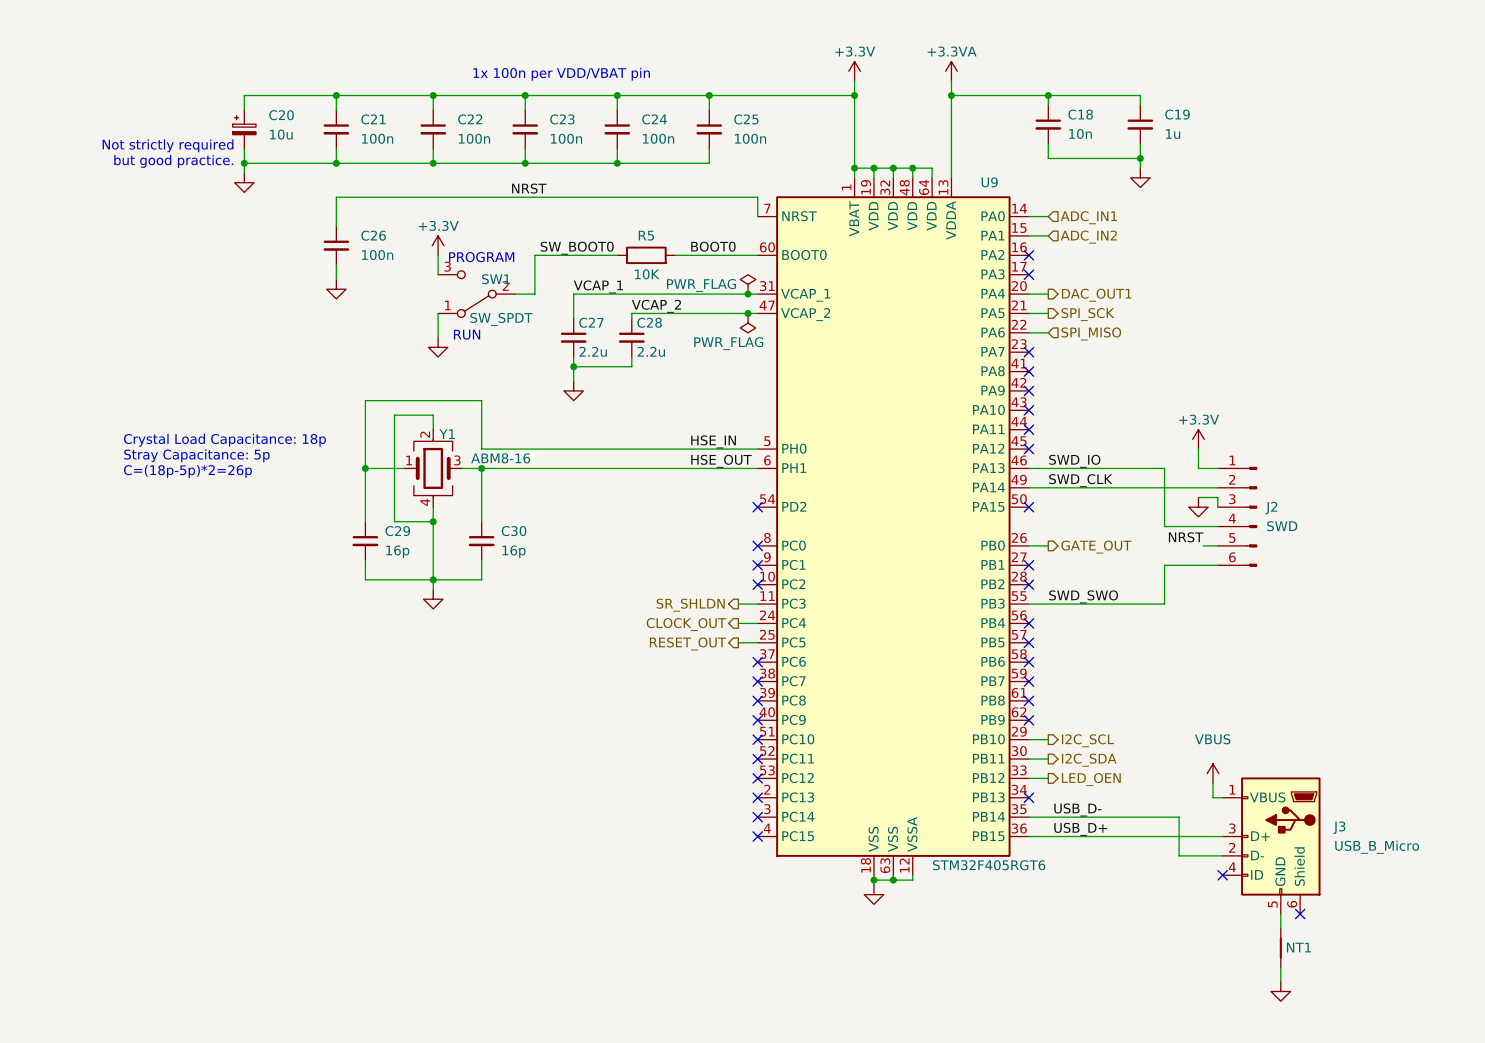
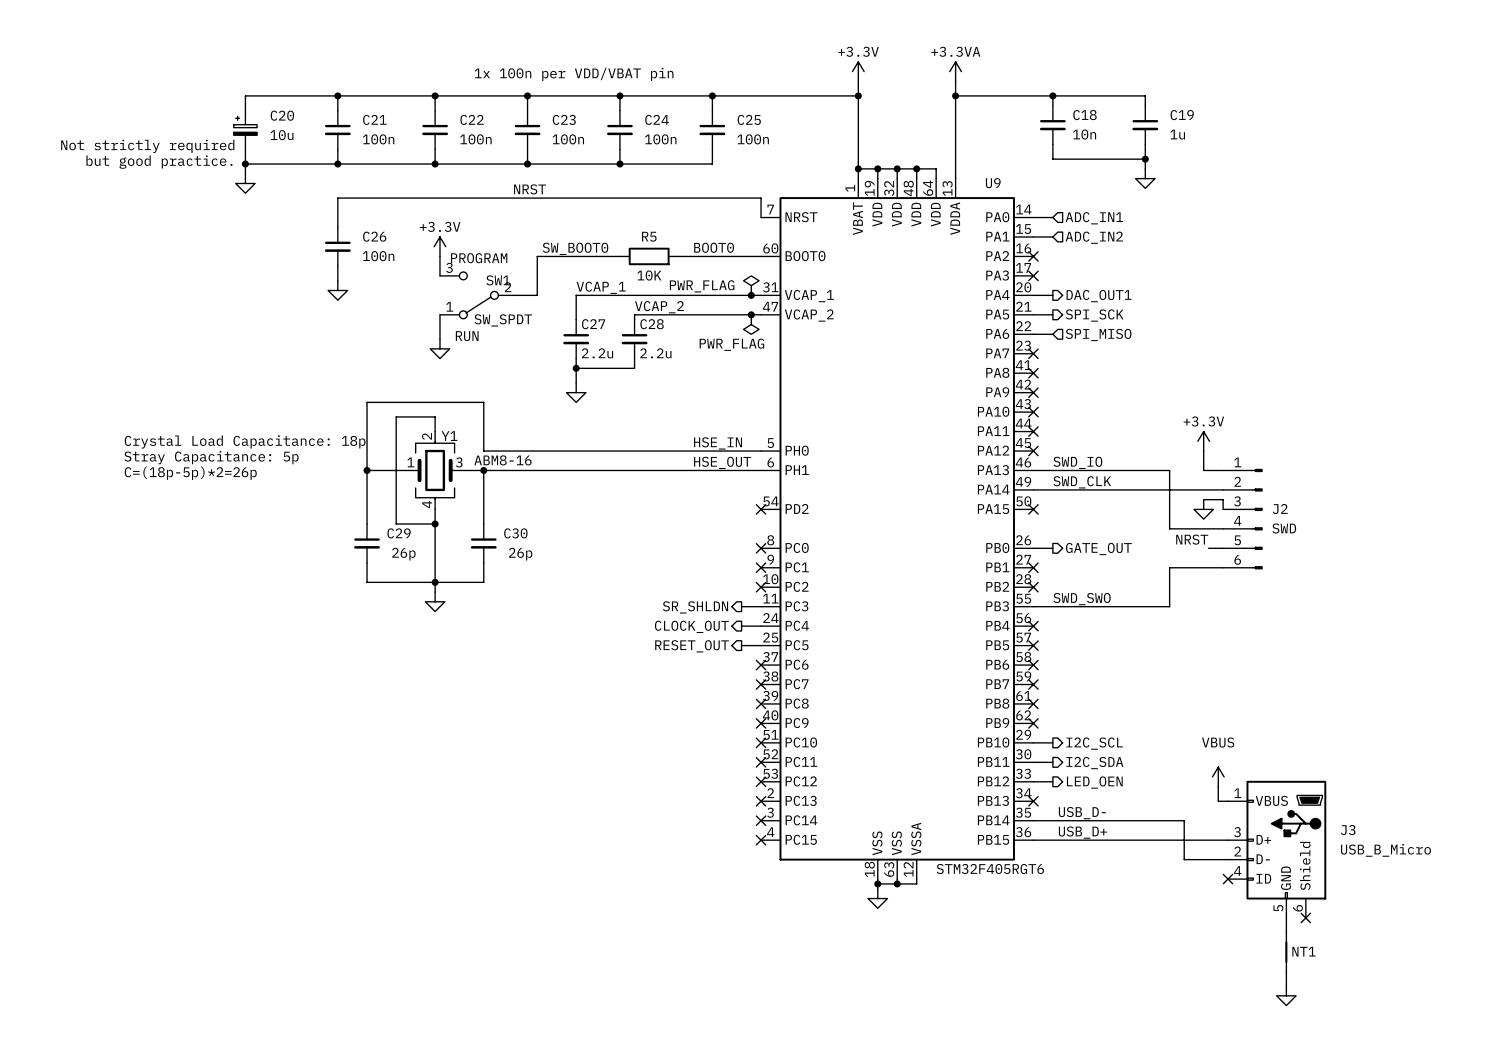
C29 value: 16p (397, 551) -> 26p (403, 554)
C30 value: 16p (514, 551) -> 26p (520, 554)

